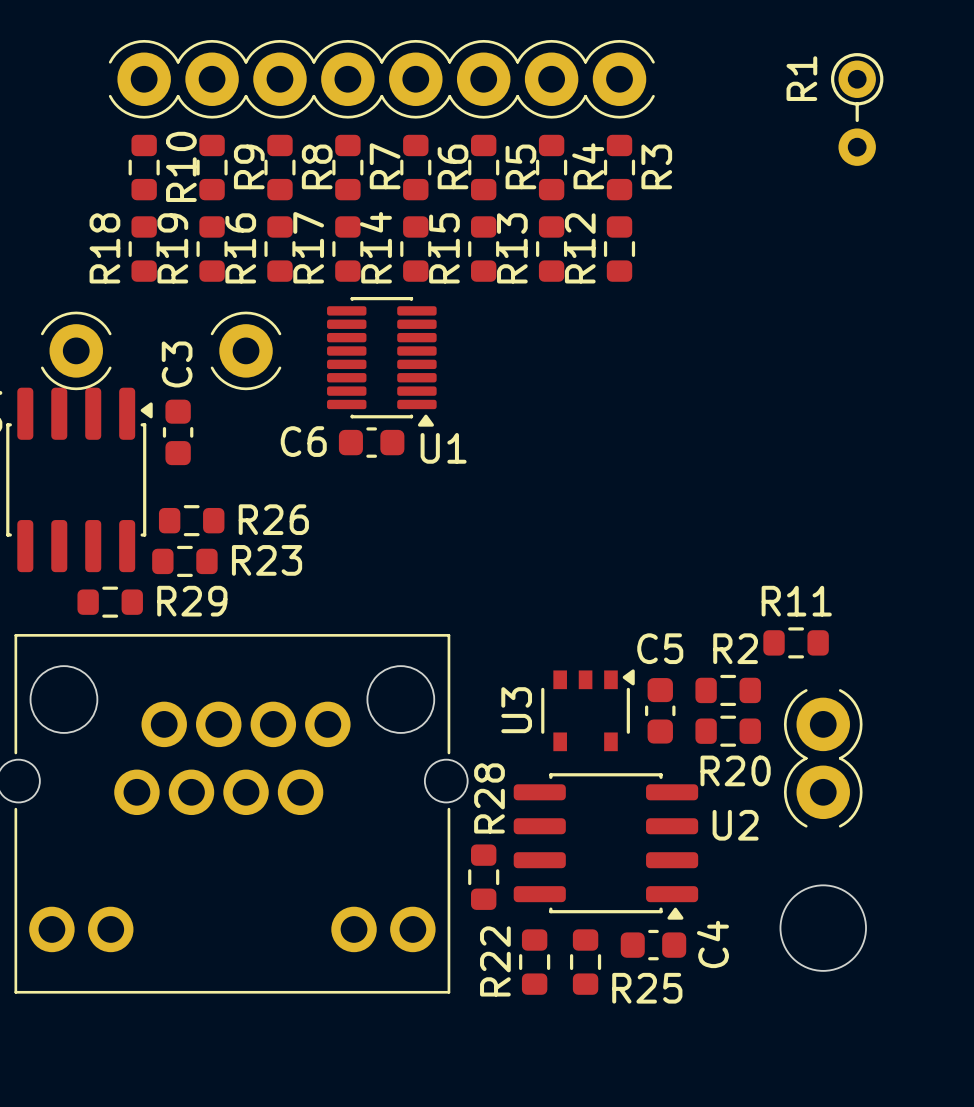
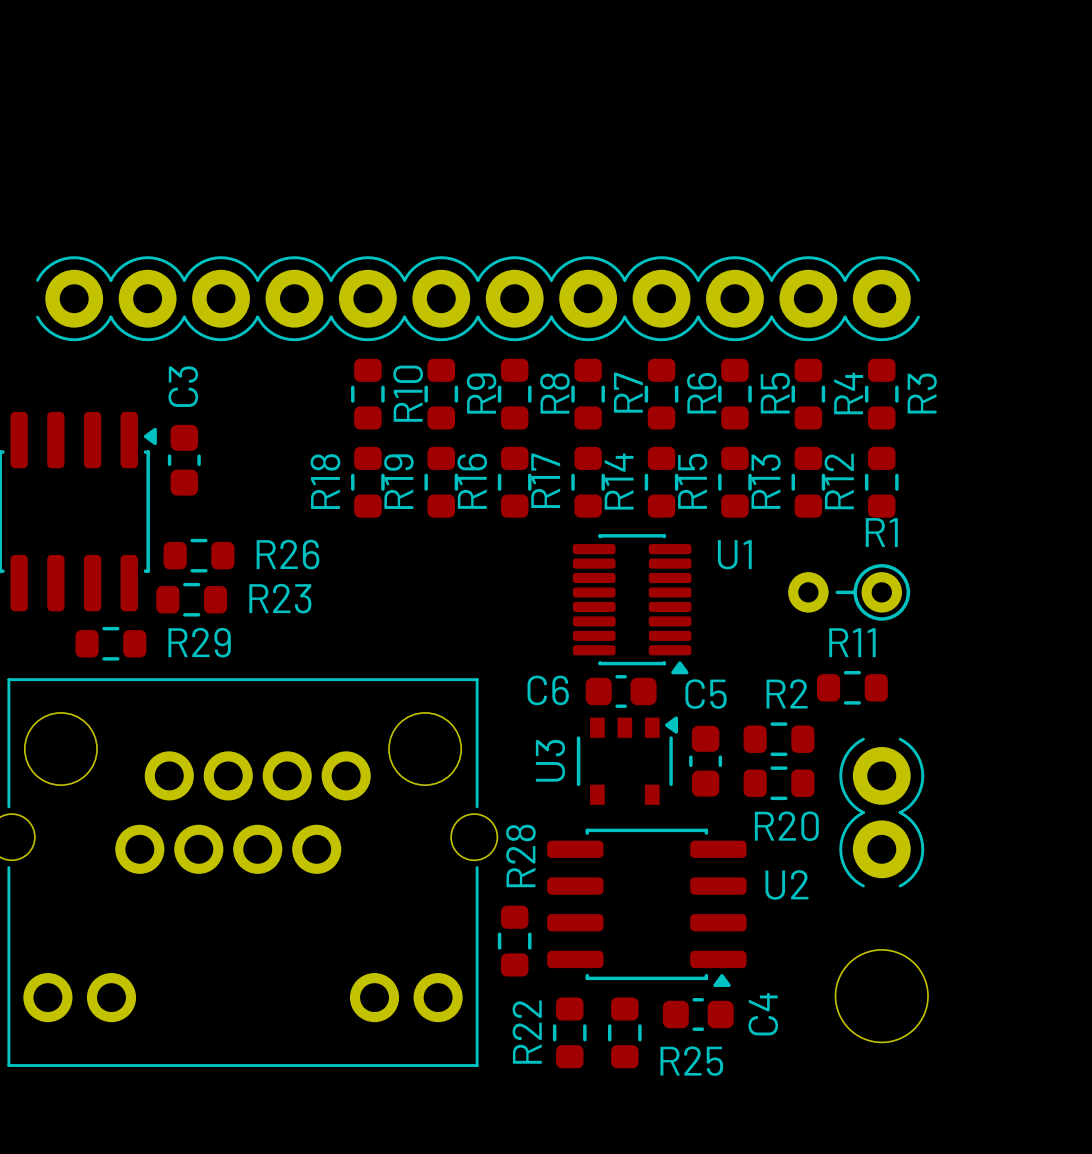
part: (144, 79) -> none
part: (212, 79) -> none
part: (279, 79) -> none
part: (347, 79) -> none
part: (415, 79) -> none
part: (483, 79) -> none
part: (551, 79) -> none
part: (619, 79) -> none
R1 rotation: 0° (857, 109) -> 90° clockwise (849, 592)
R1 position: (857, 109) -> (849, 592)
R10 position: (144, 167) -> (367, 394)
R9 position: (212, 167) -> (441, 394)
R8 position: (279, 167) -> (514, 394)
R7 position: (347, 167) -> (588, 394)
R6 position: (415, 167) -> (661, 394)
R5 position: (483, 167) -> (734, 394)
R4 position: (551, 167) -> (808, 394)
R3 position: (619, 167) -> (881, 394)
R18 position: (144, 249) -> (367, 482)
R19 position: (212, 249) -> (441, 482)
R16 position: (279, 249) -> (514, 482)
R17 position: (347, 249) -> (588, 482)
R14 position: (415, 249) -> (661, 482)
R15 position: (483, 249) -> (734, 482)
R13 position: (551, 249) -> (808, 482)
R12 position: (619, 249) -> (881, 482)
part: none -> (74, 298)
part: none -> (147, 298)
part: none -> (221, 298)
part: none -> (294, 298)
part: none -> (367, 298)
part: none -> (441, 298)
part: none -> (514, 298)
part: none -> (588, 298)
part: none -> (661, 298)
part: none -> (734, 298)
part: none -> (808, 298)
part: none -> (881, 298)
part: (76, 350) -> none
part: (246, 350) -> none
U1 position: (381, 361) -> (632, 604)
C6 position: (371, 442) -> (621, 691)
U1 name position: U1 (443, 448) -> U1 (734, 554)

